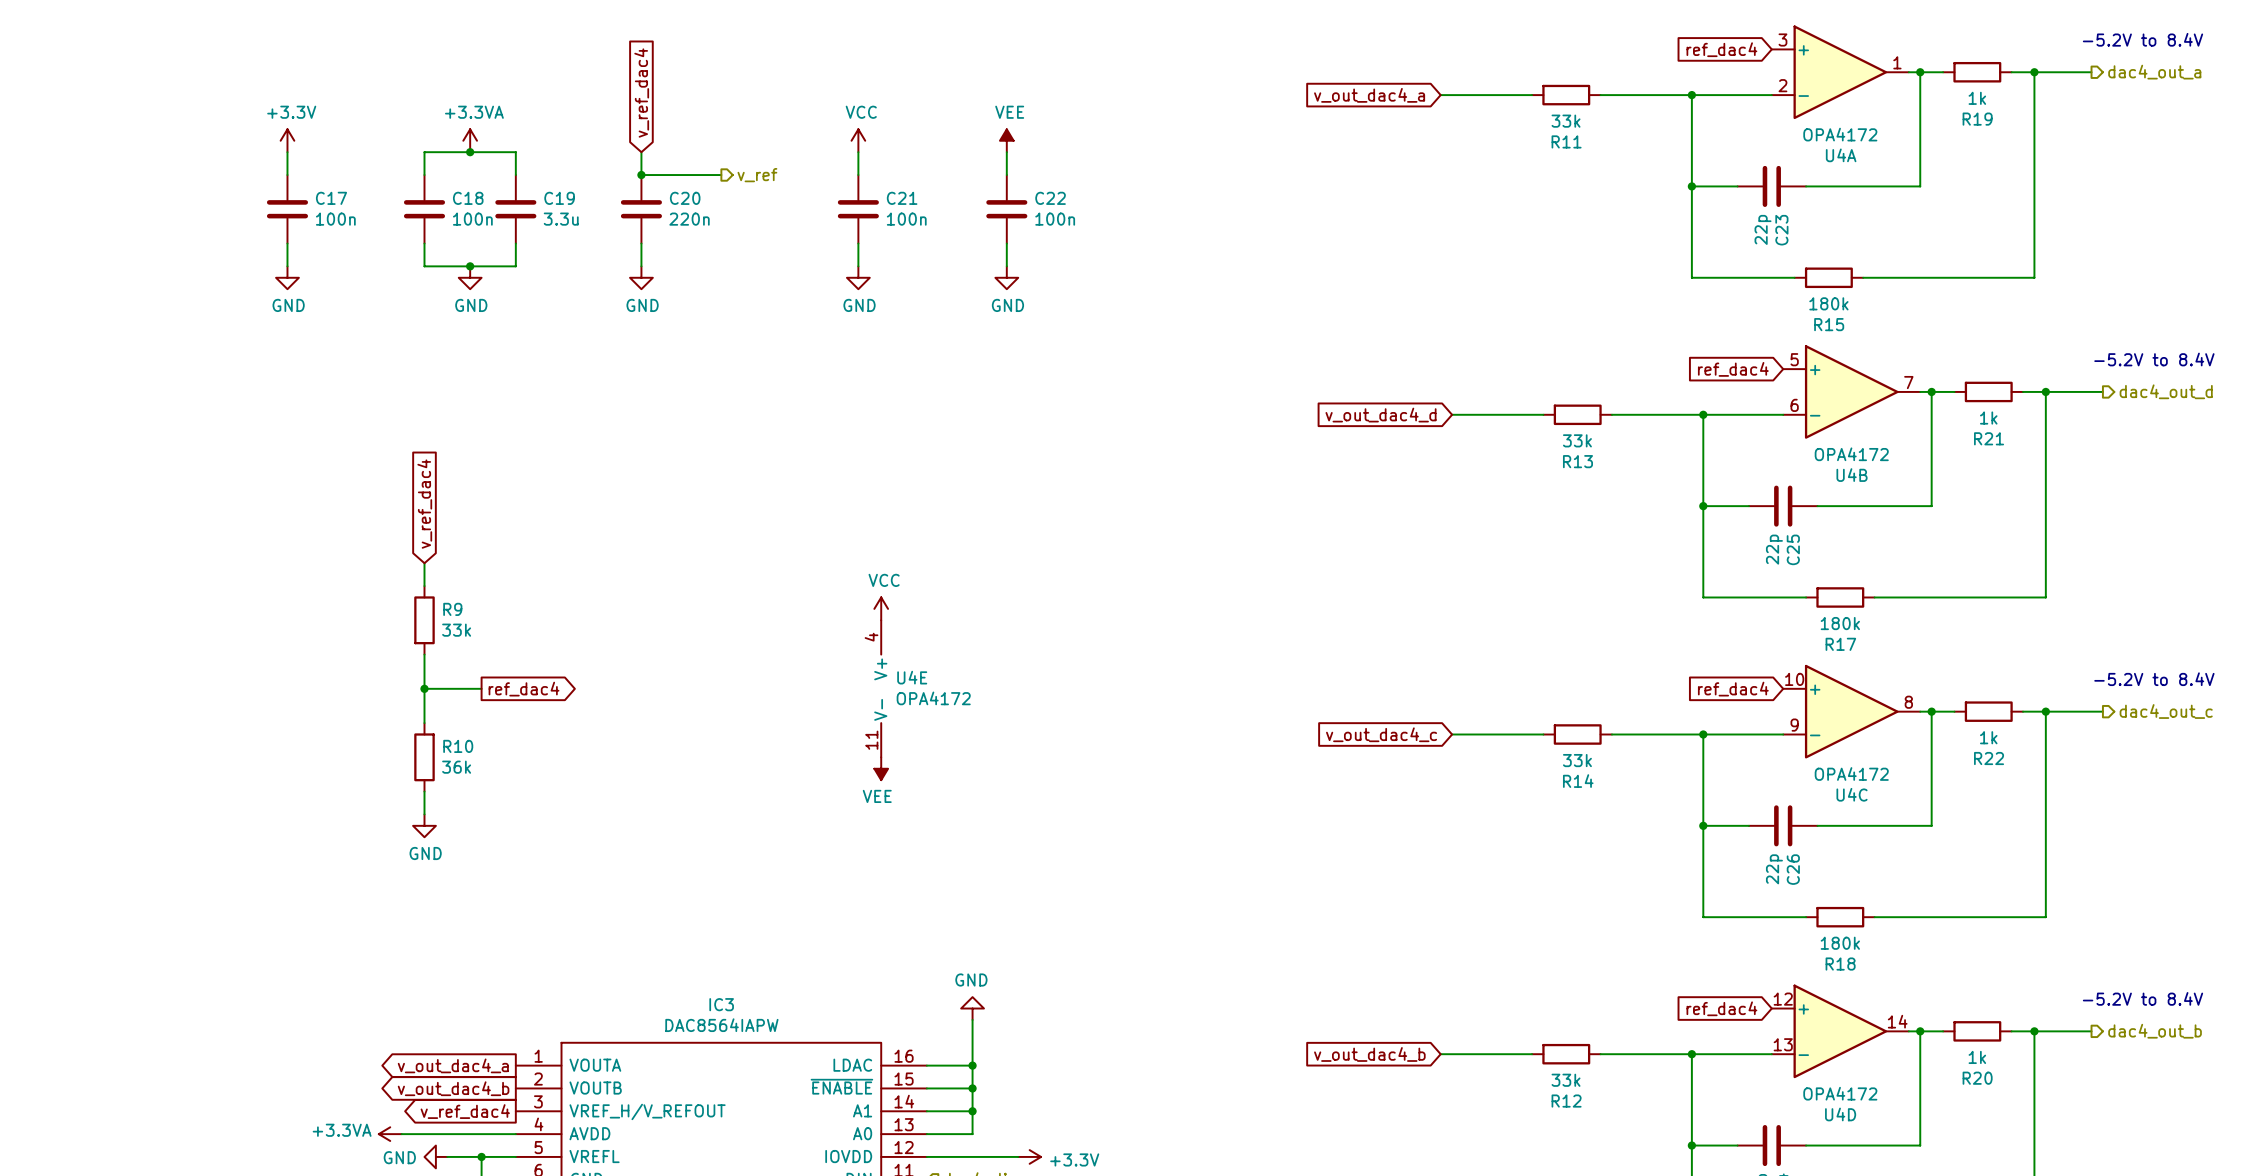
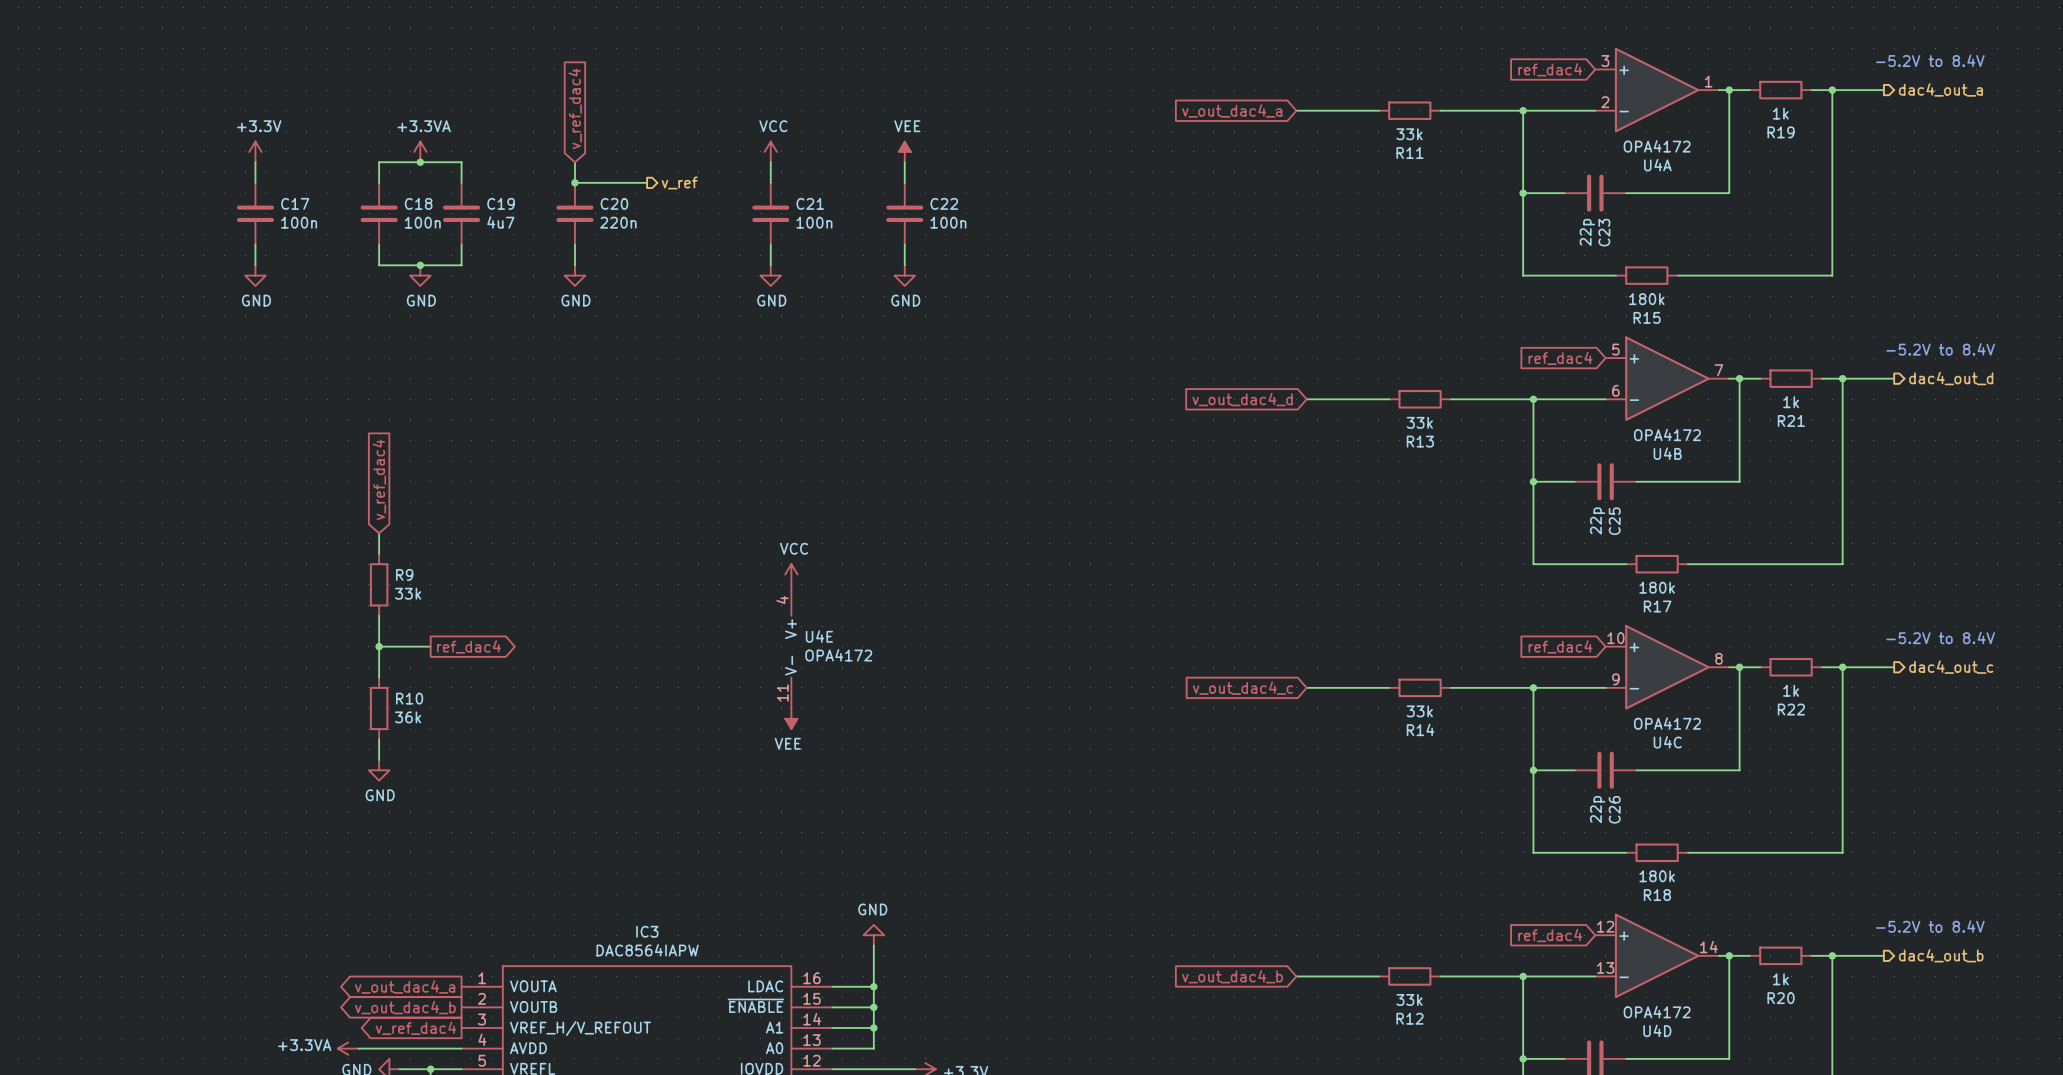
C19 value: 3.3u (561, 219) -> 4u7 (500, 222)

